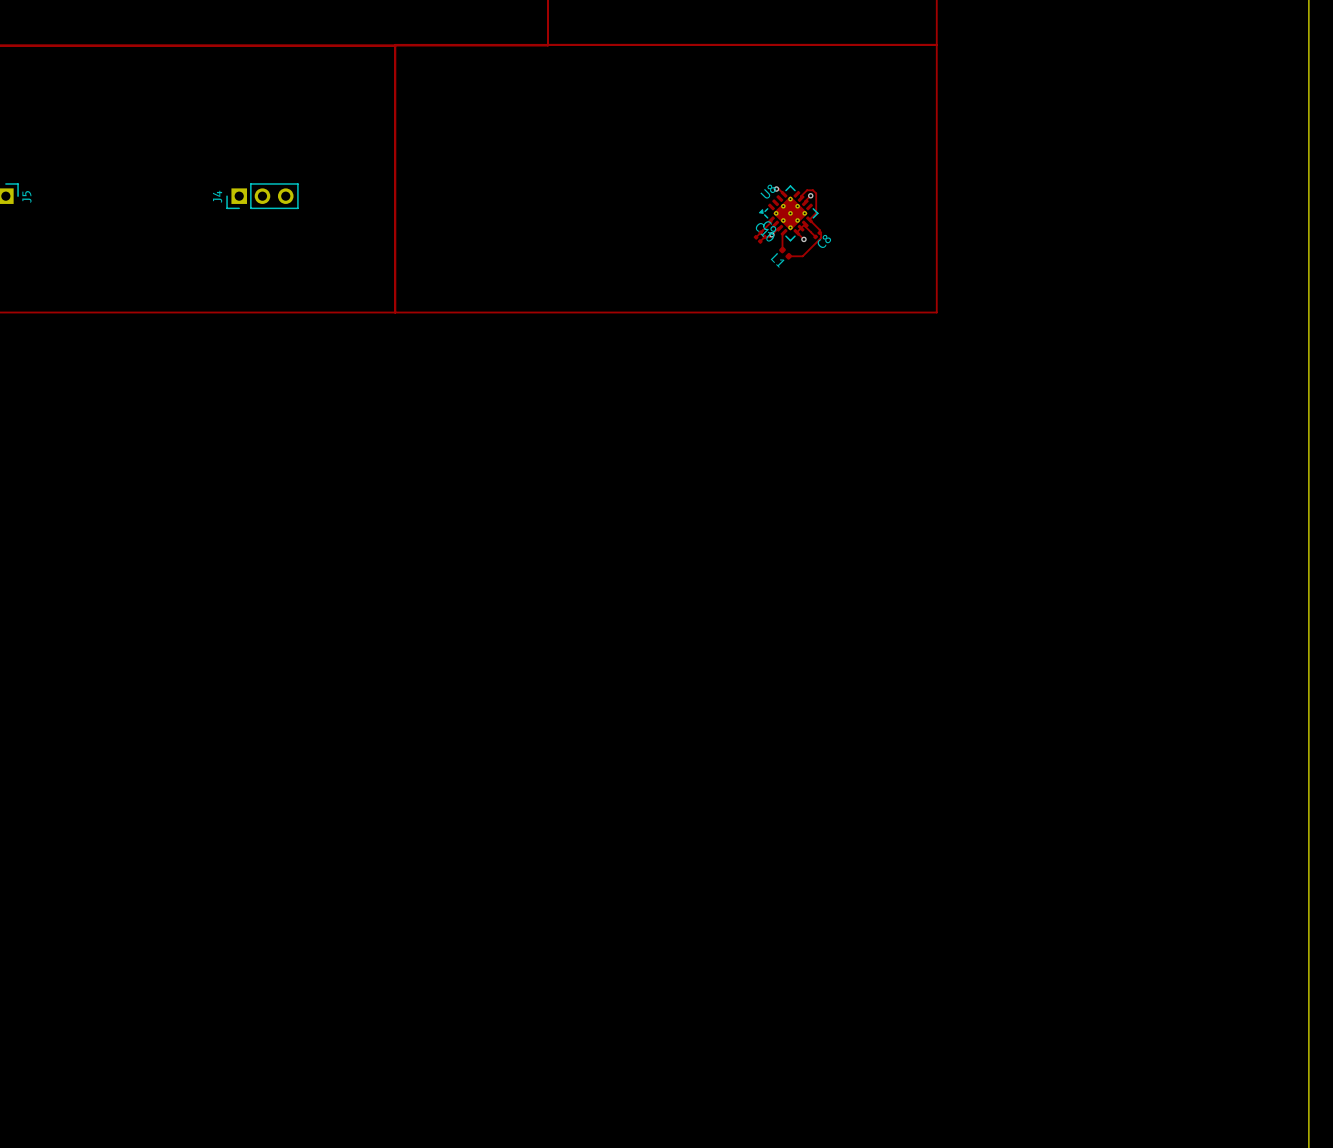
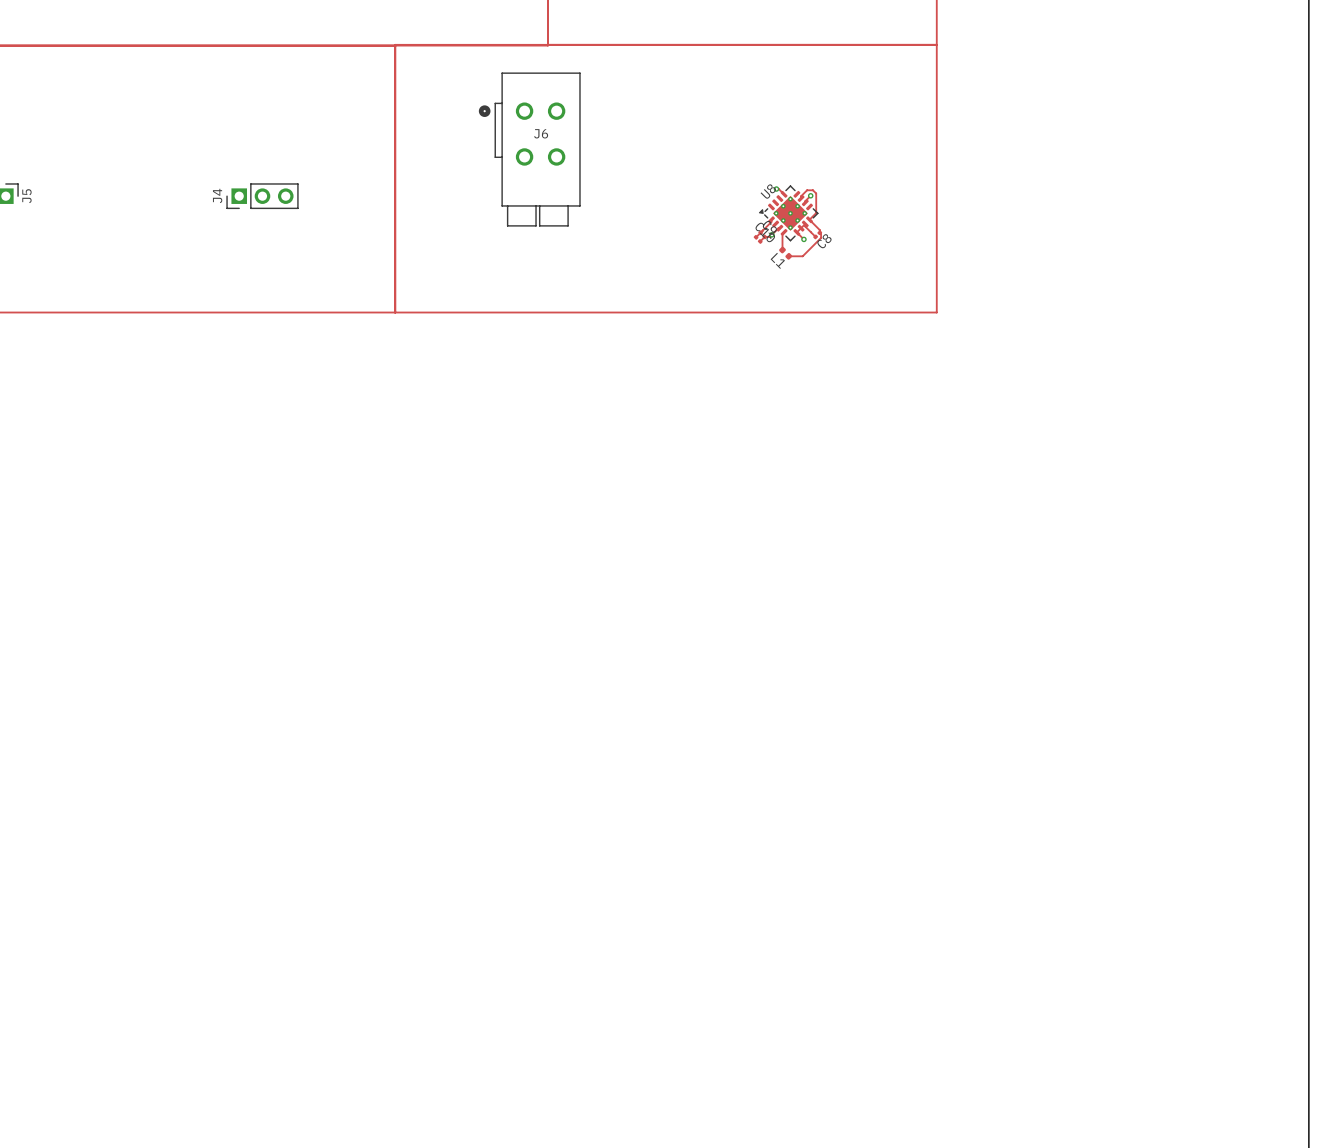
J6: none -> (529, 149)

